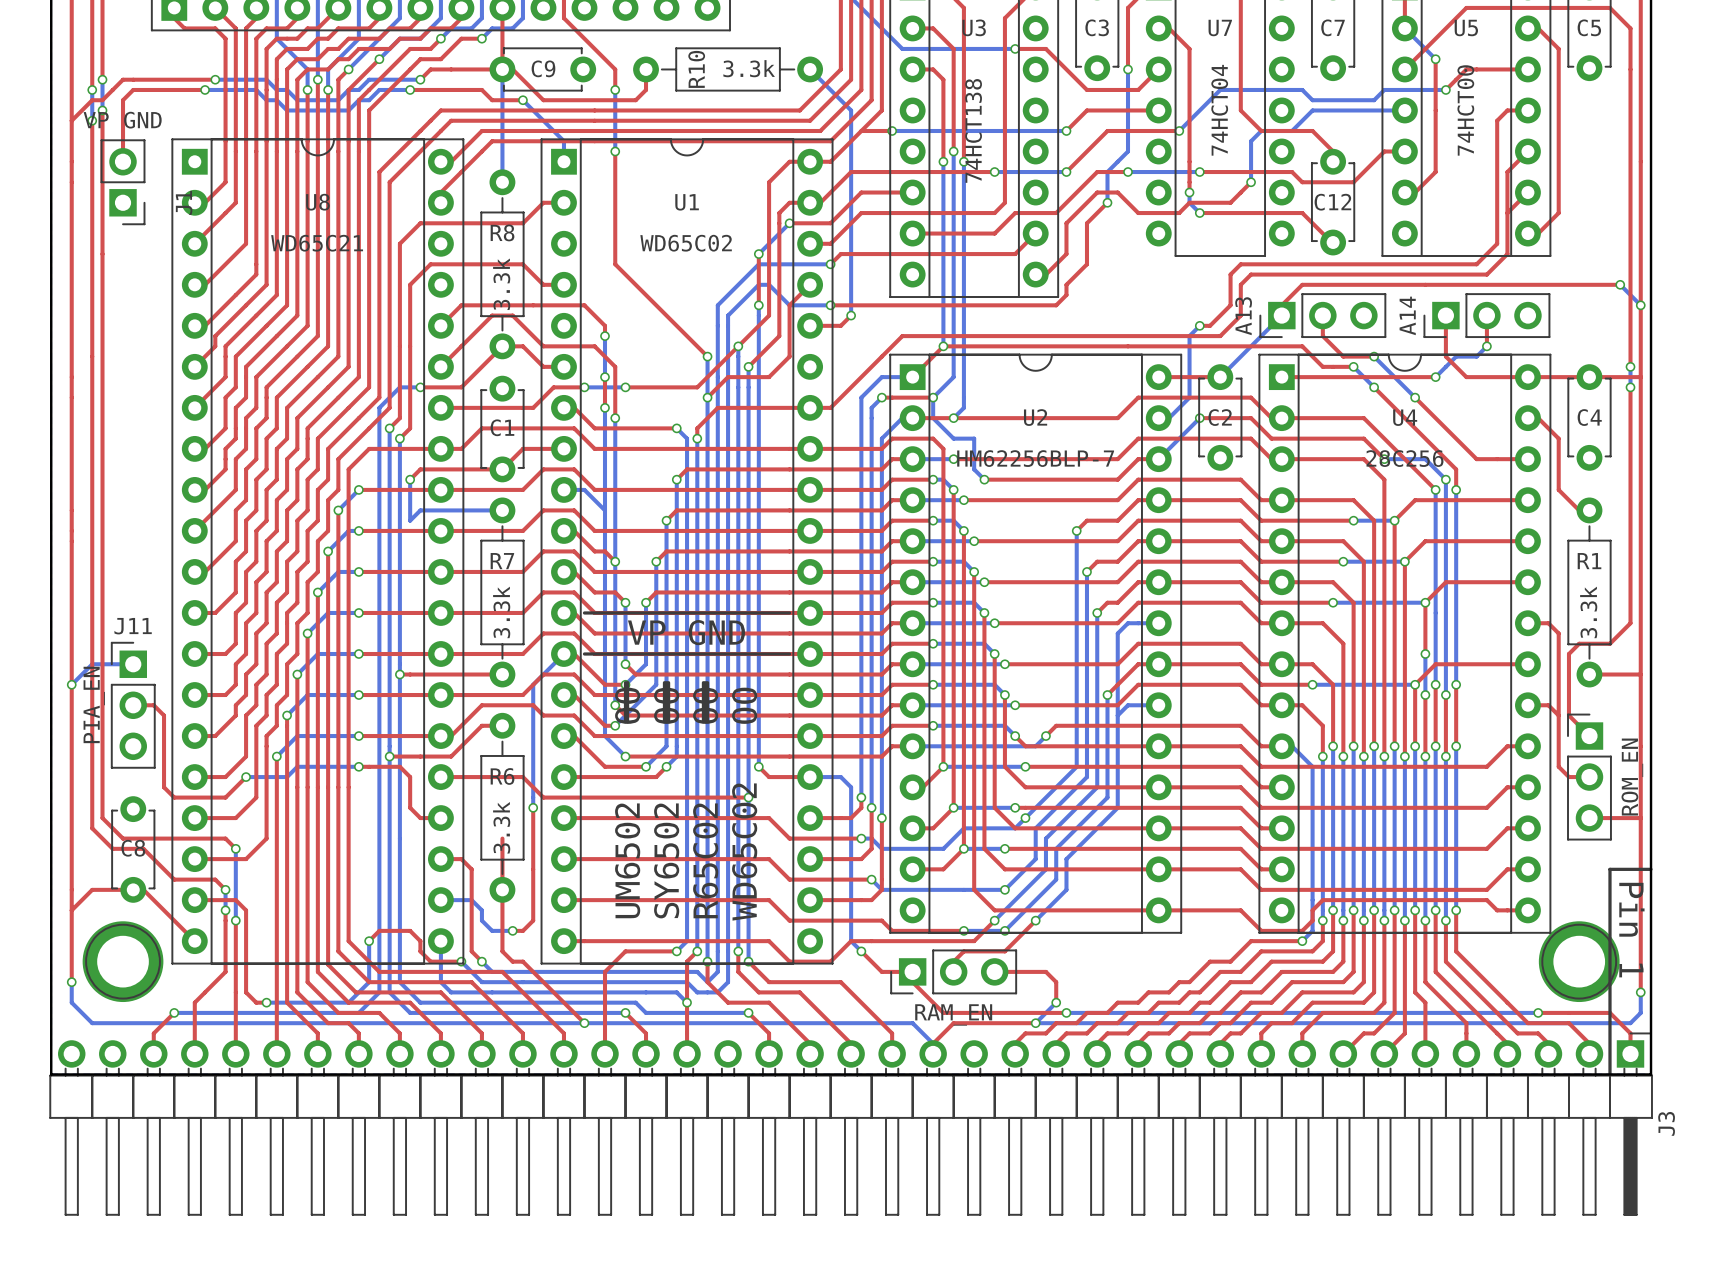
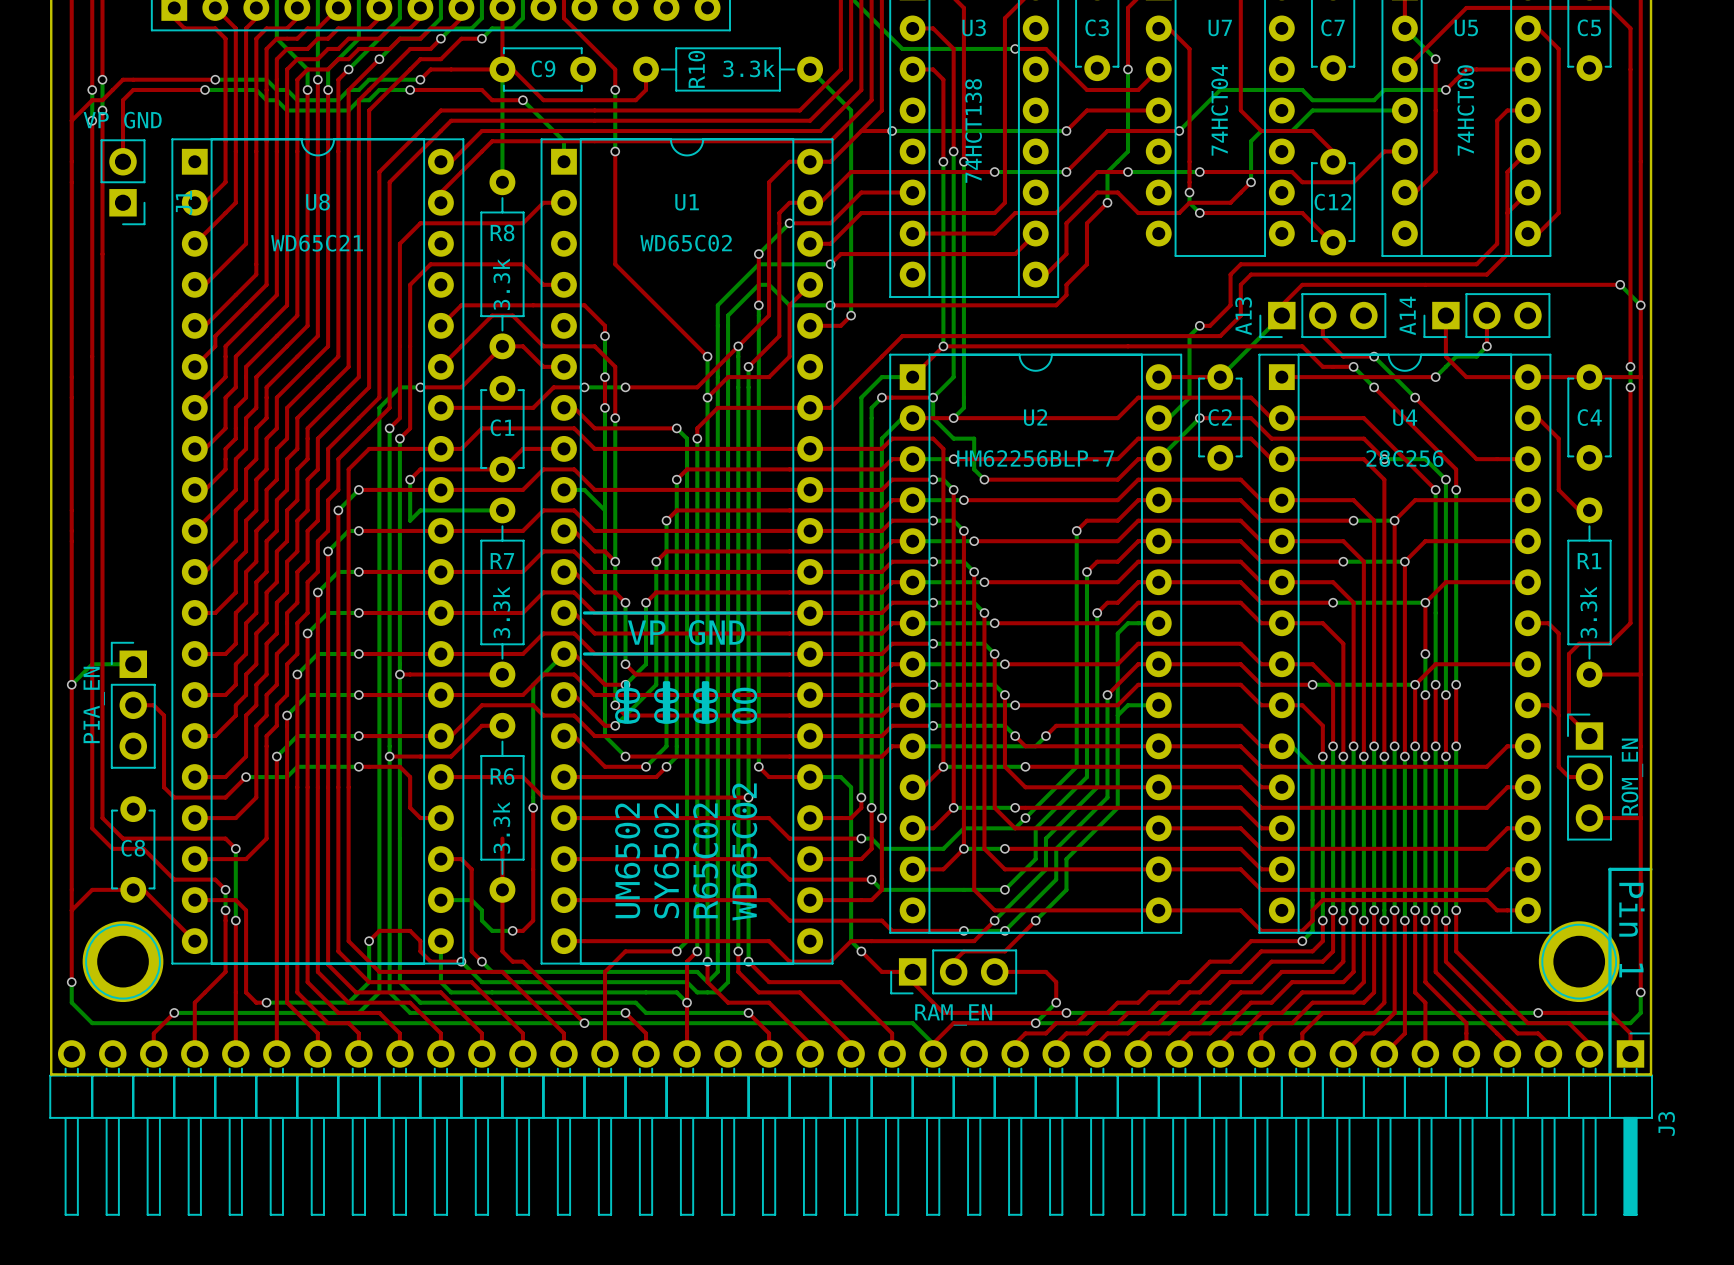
J11 name: J11 (133, 626) -> none

